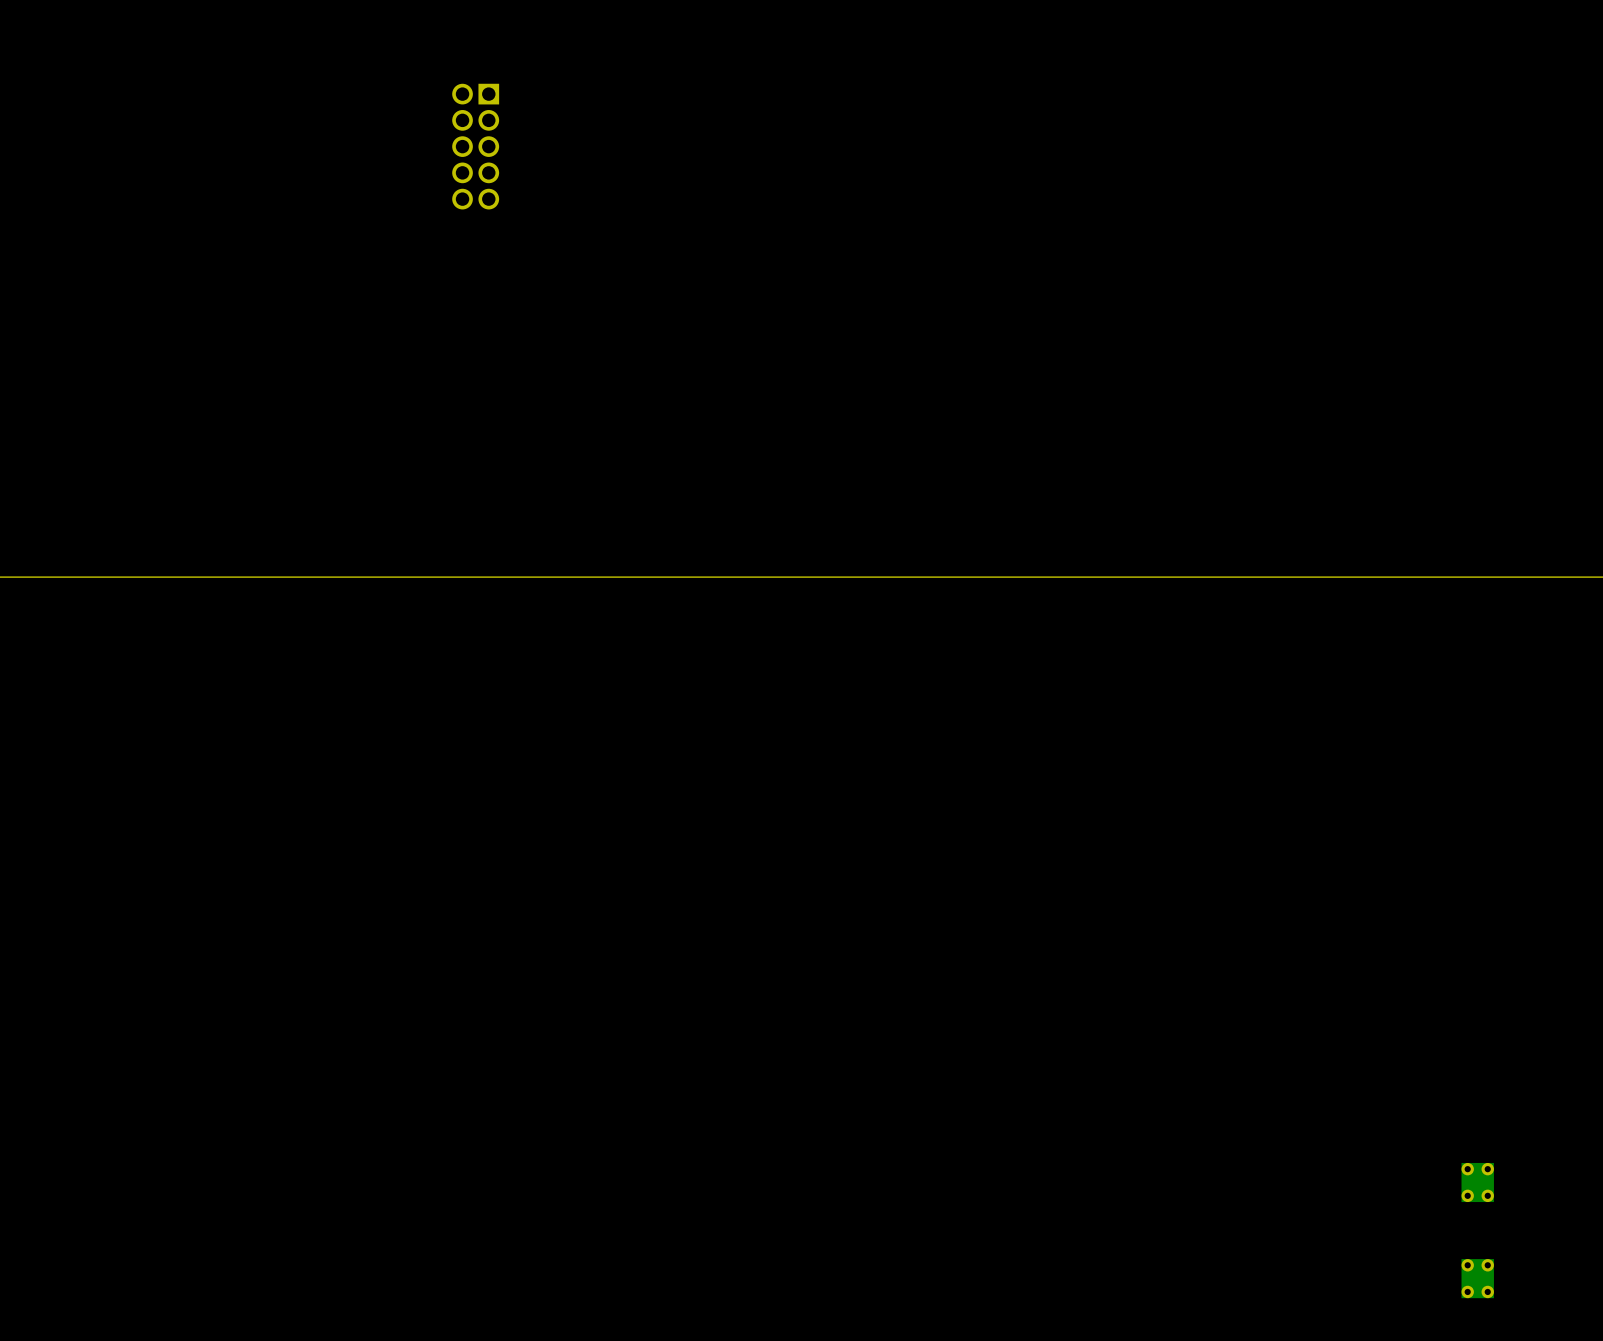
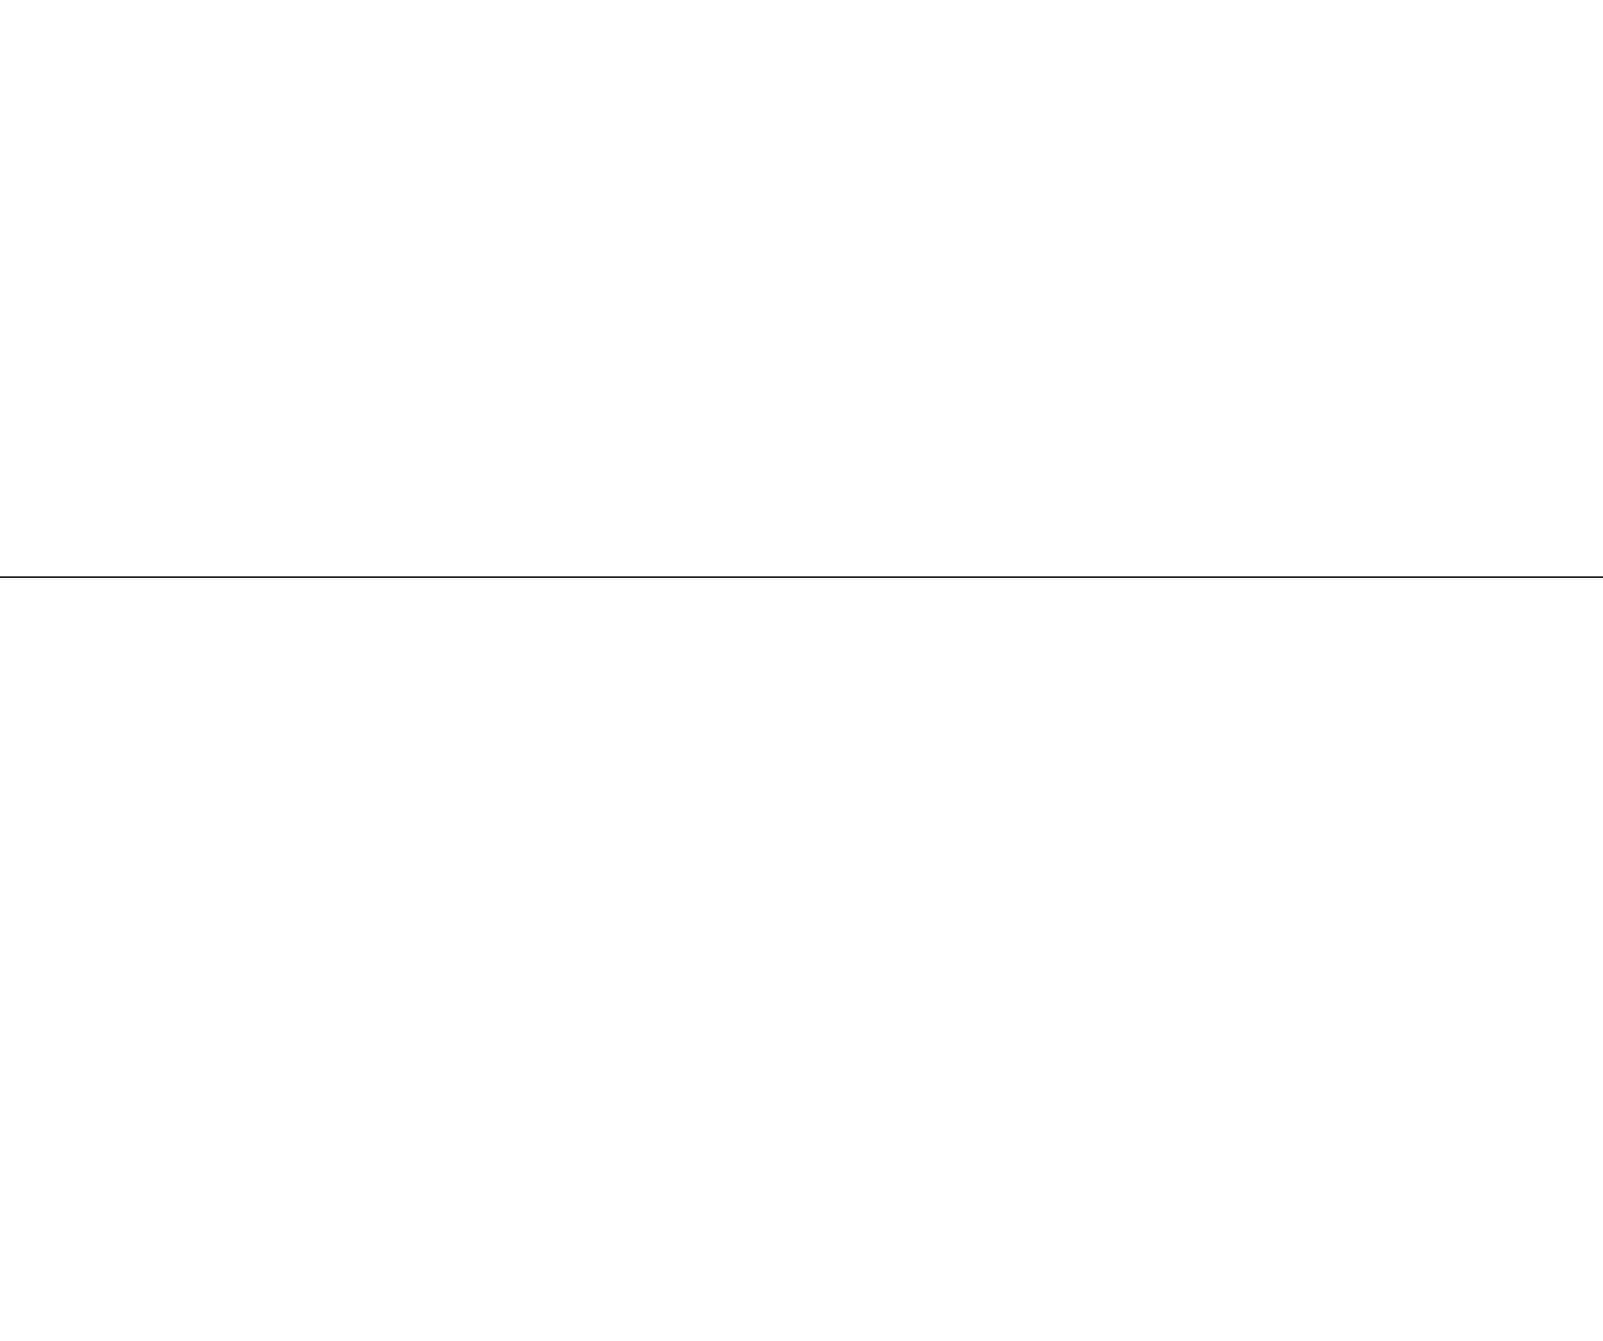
part: (475, 146) -> none
part: (1477, 1182) -> none
part: (1477, 1278) -> none

